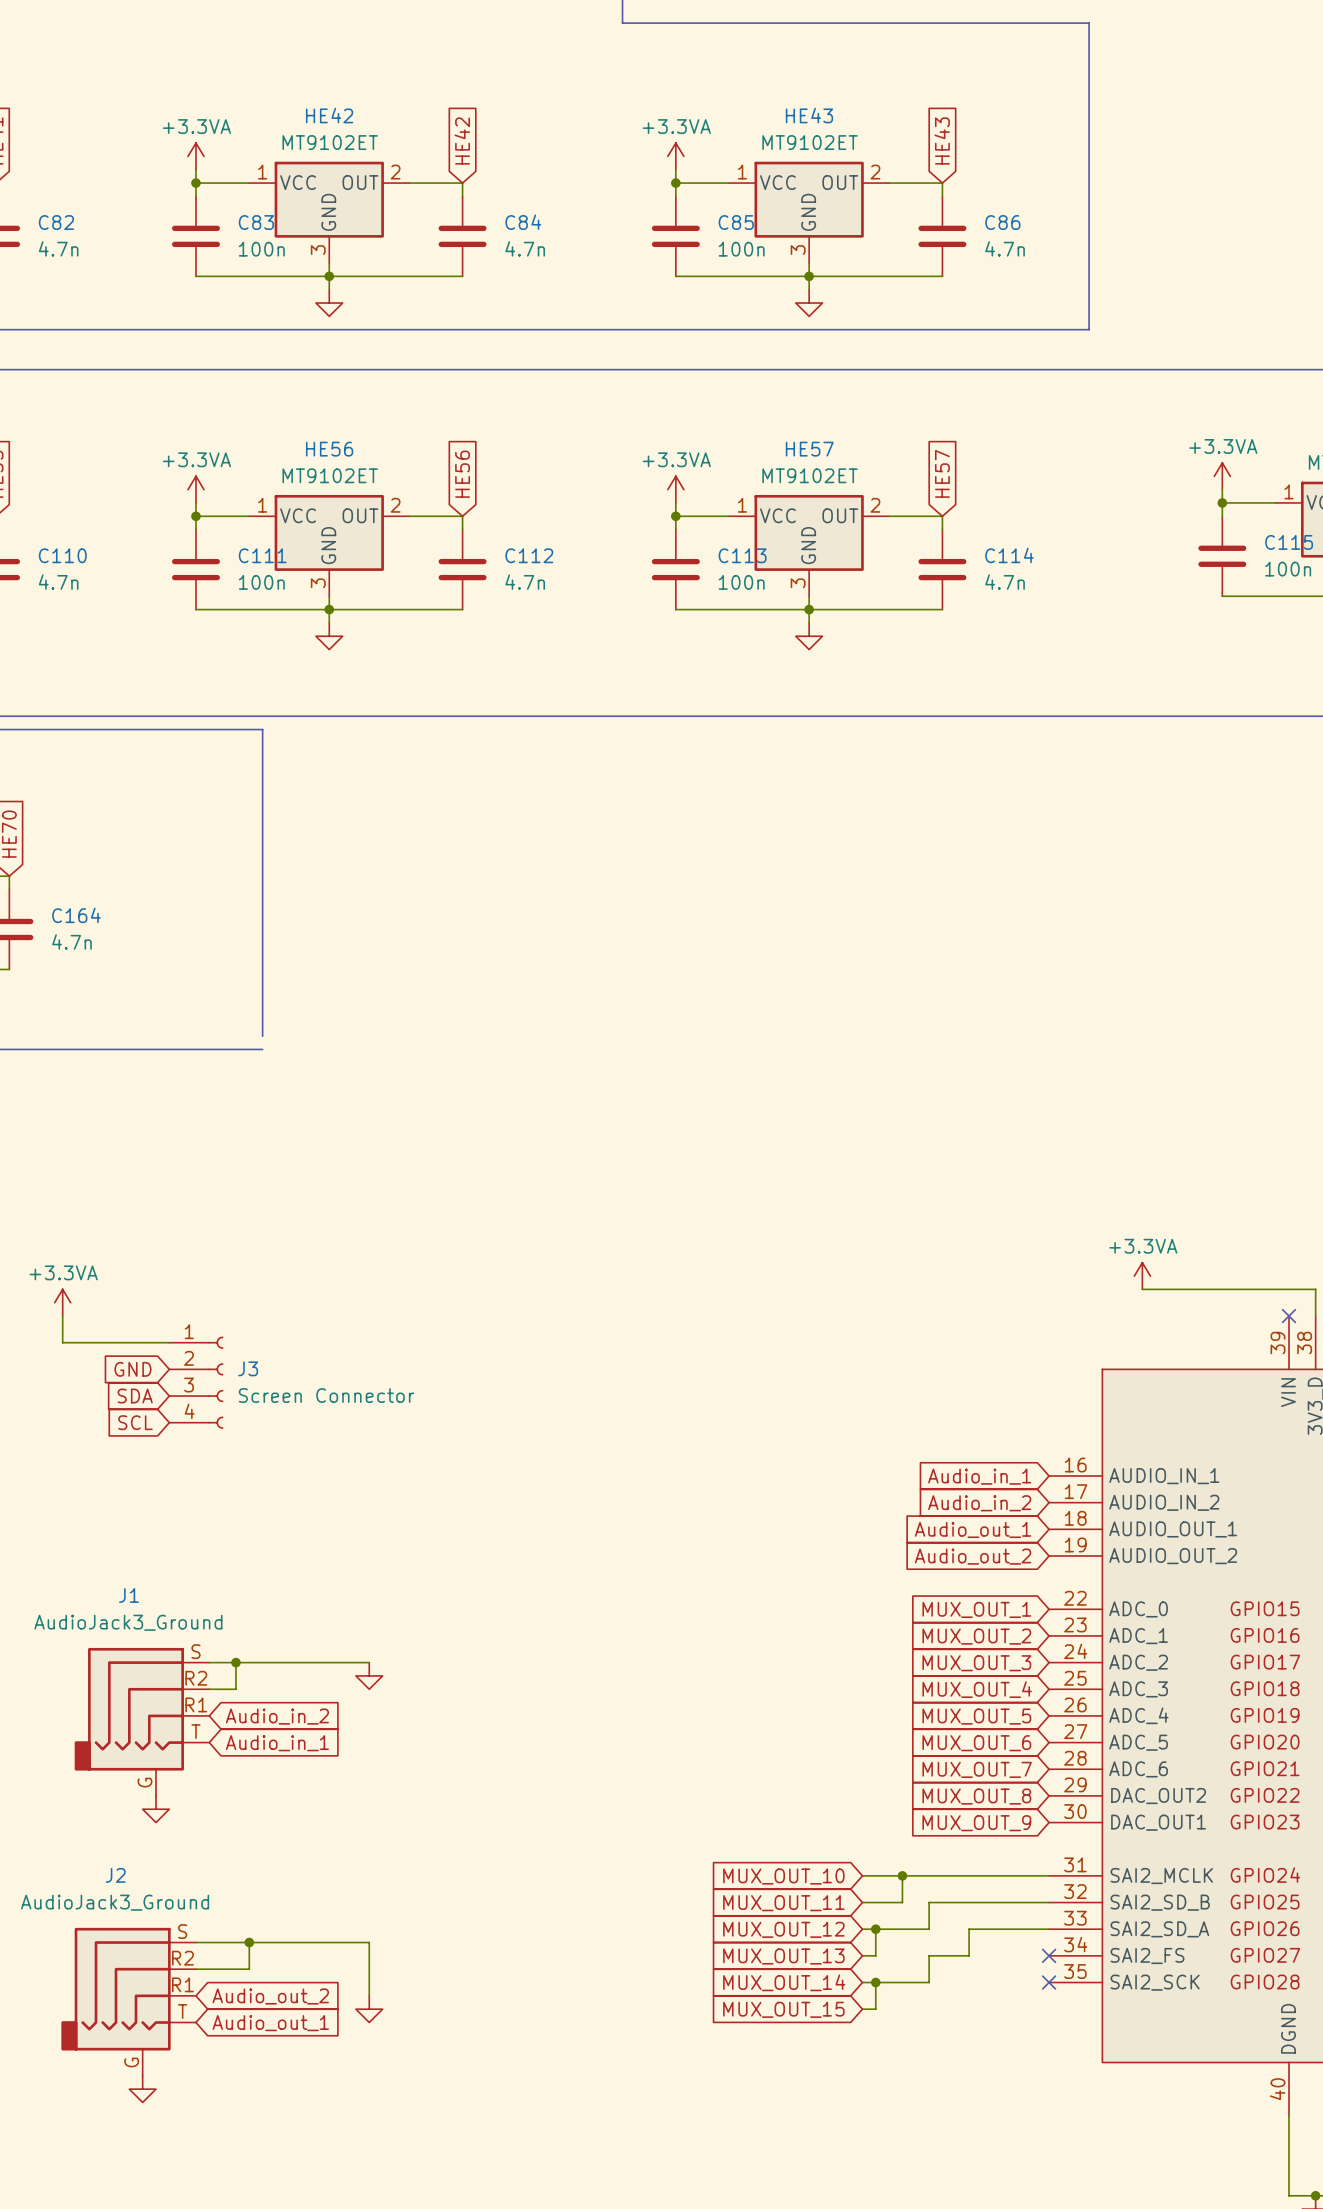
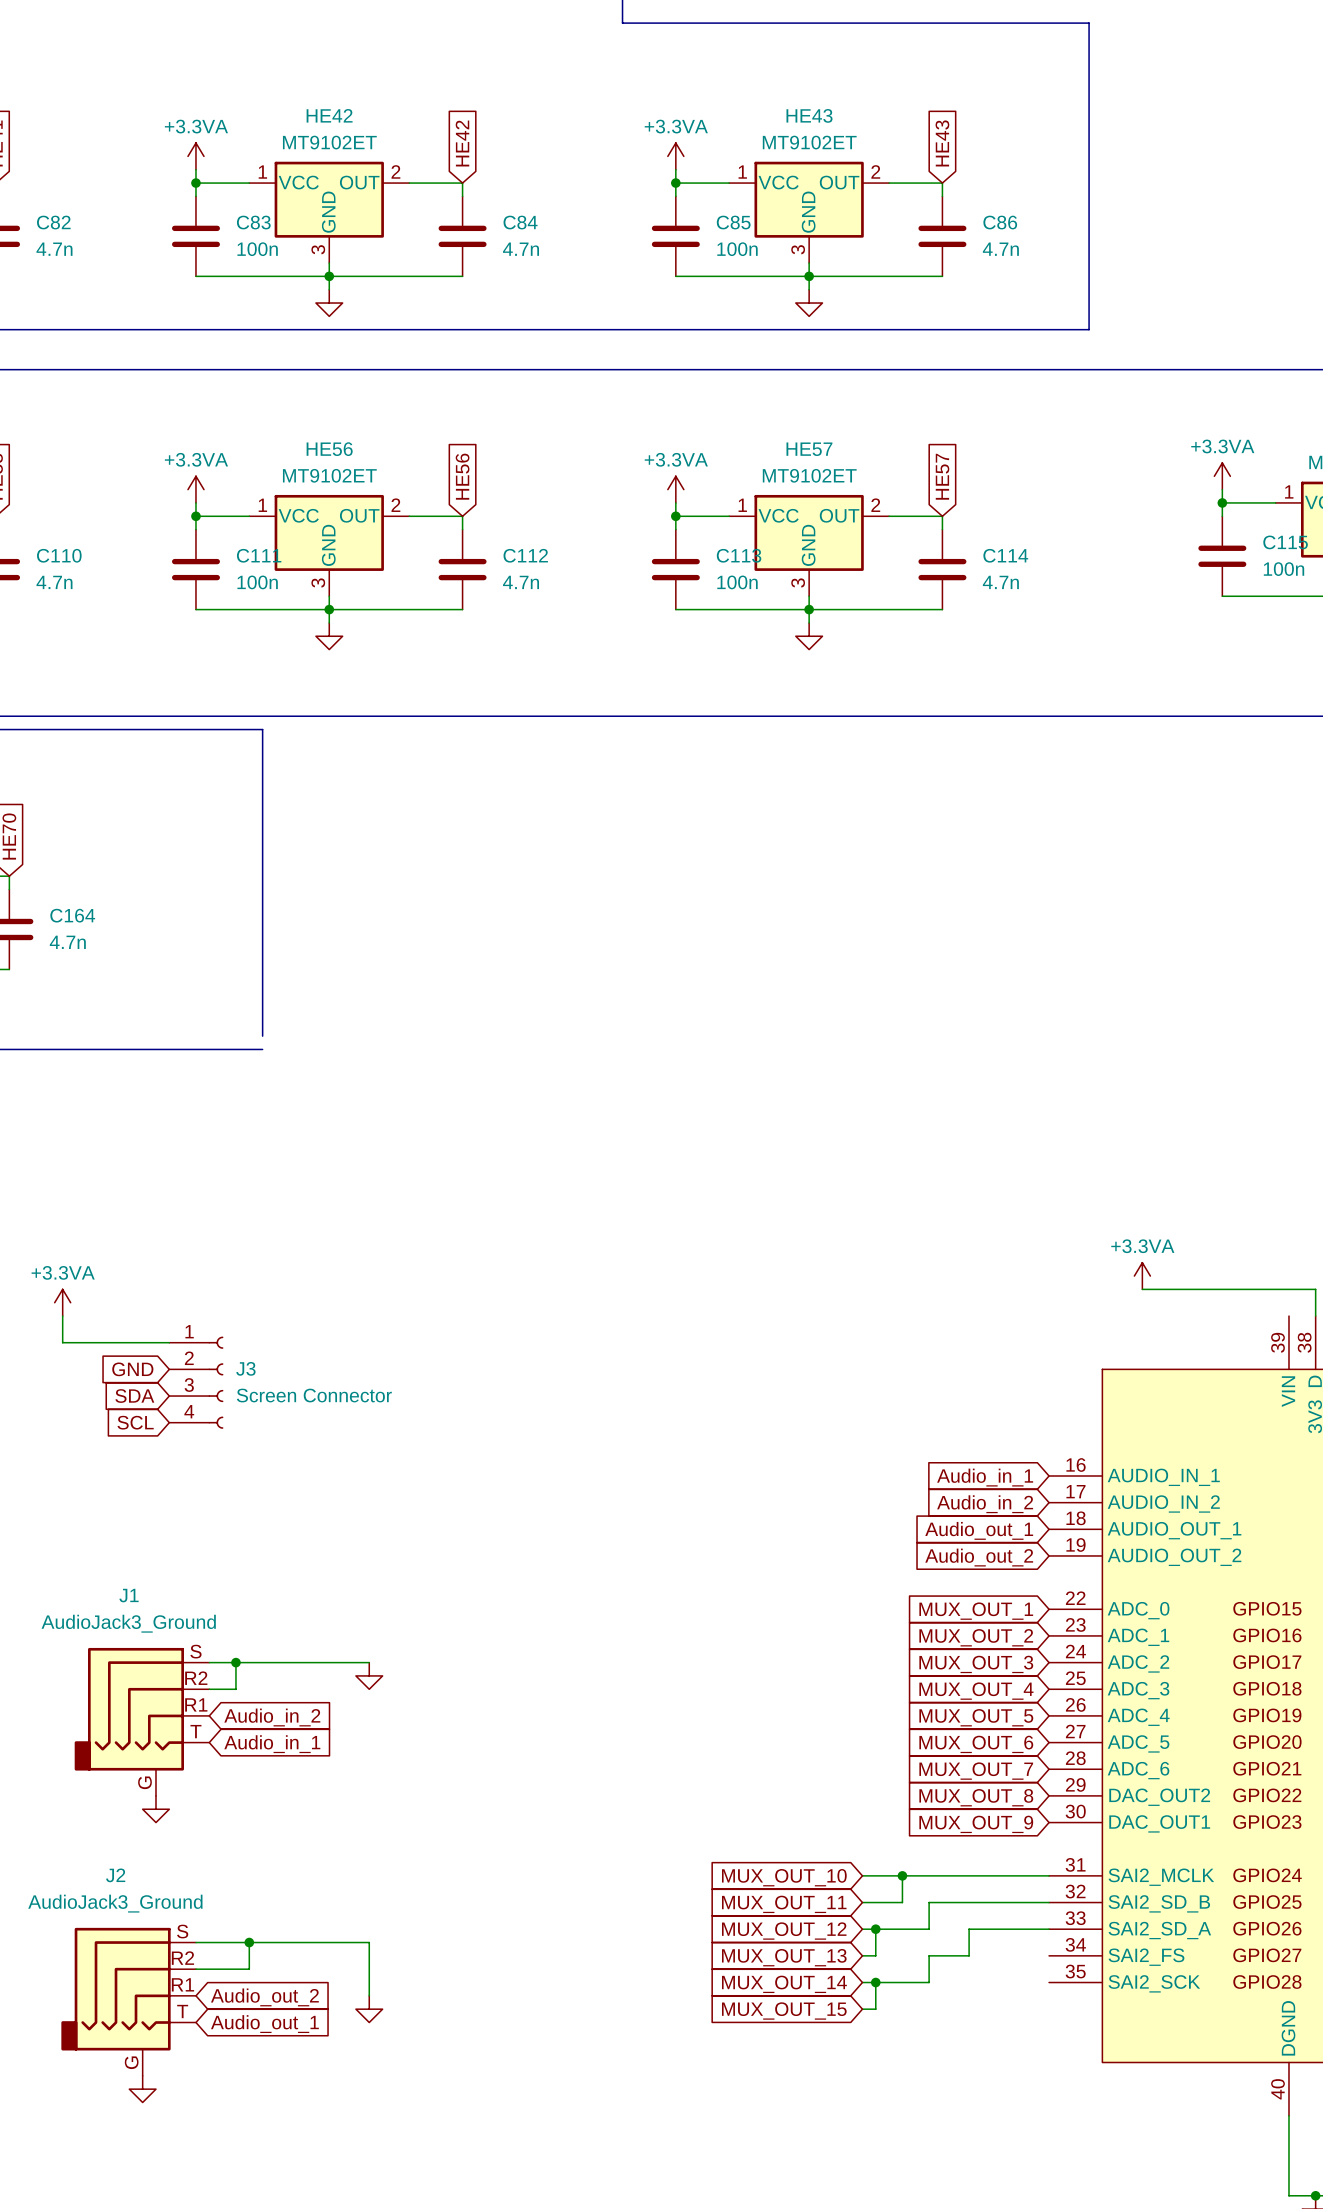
no-connect mark: (1288, 1316) -> none
no-connect mark: (1049, 1955) -> none
no-connect mark: (1049, 1982) -> none

